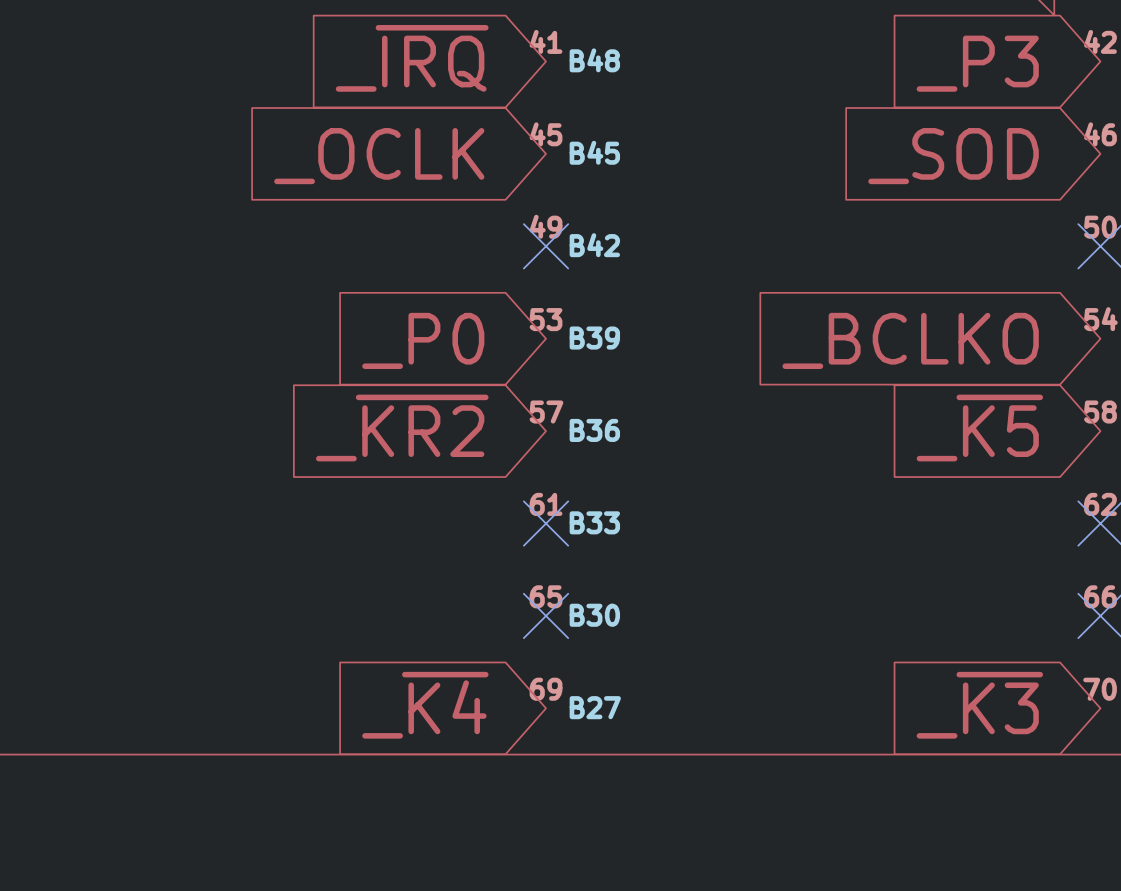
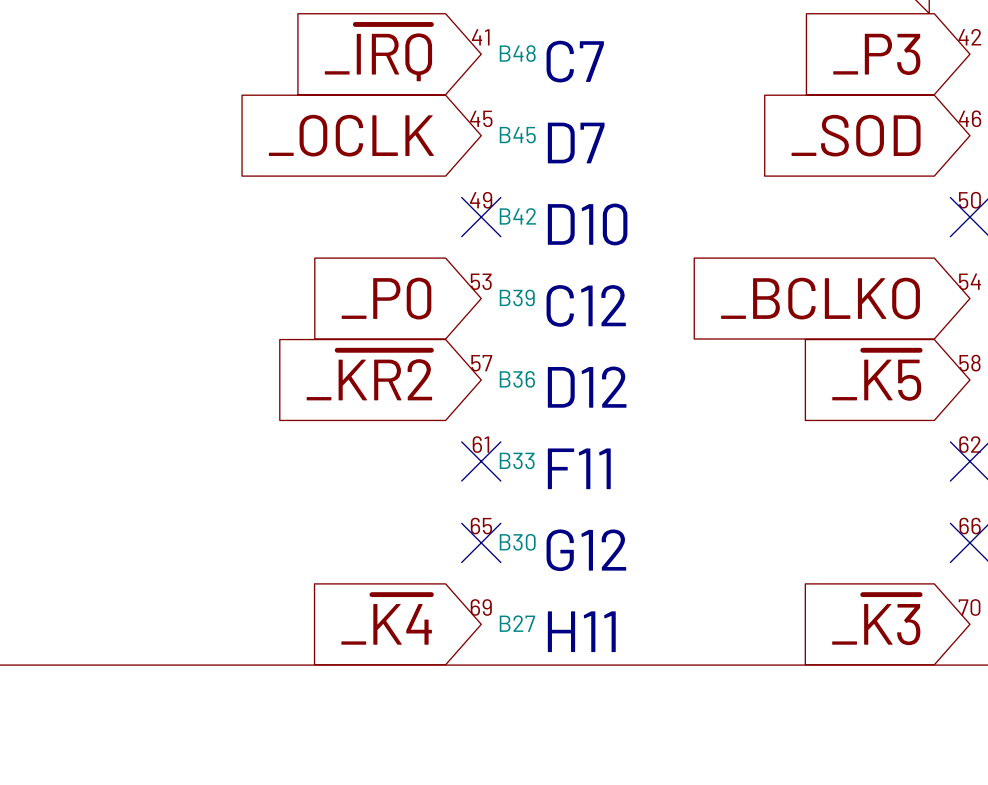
text: none -> C7 (575, 61)
text: none -> D7 (576, 143)
text: none -> D10 (587, 224)
text: none -> C12 (586, 305)
text: none -> D12 (587, 387)
text: none -> F11 (579, 468)
text: none -> G12 (586, 550)
text: none -> H11 (581, 631)

